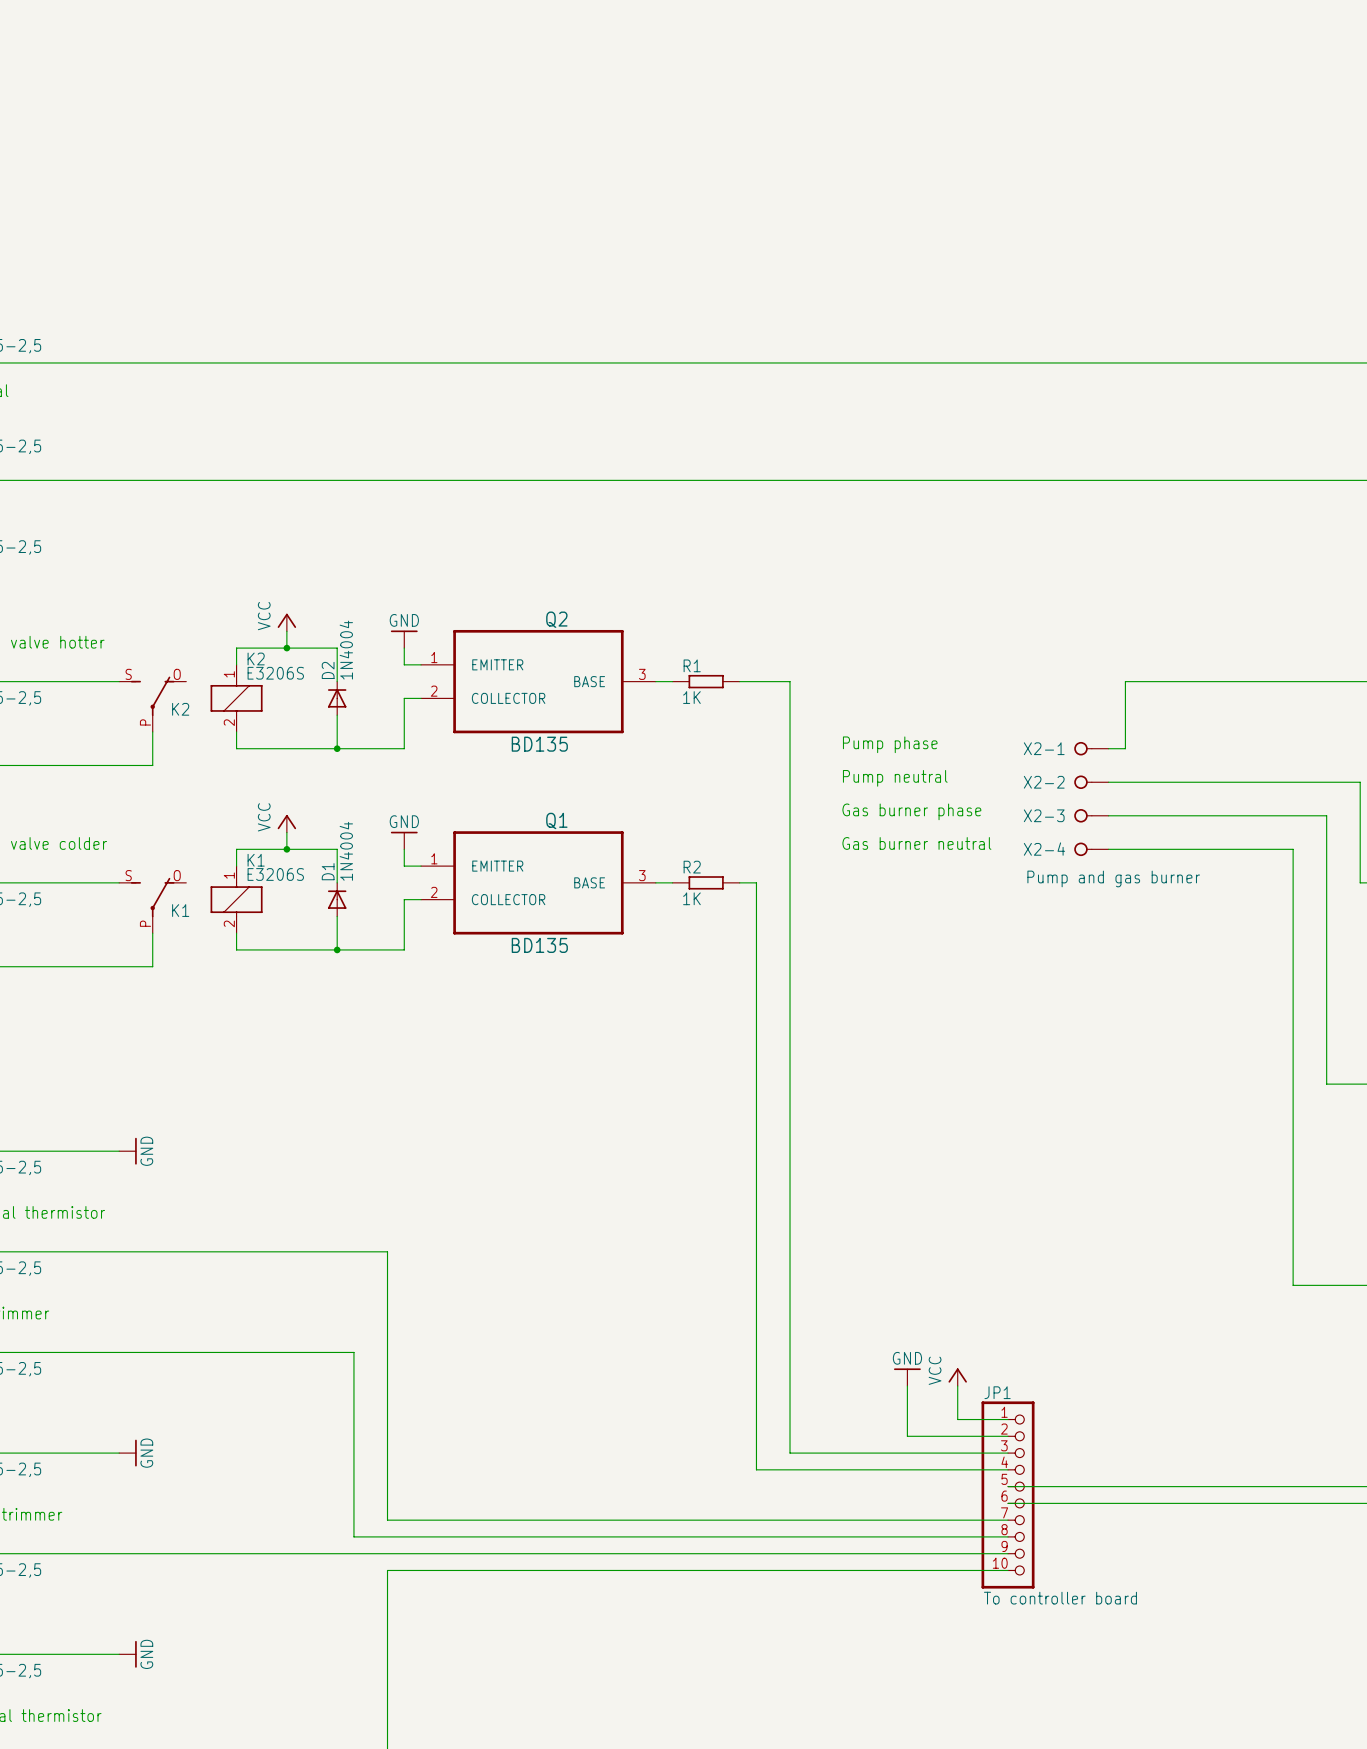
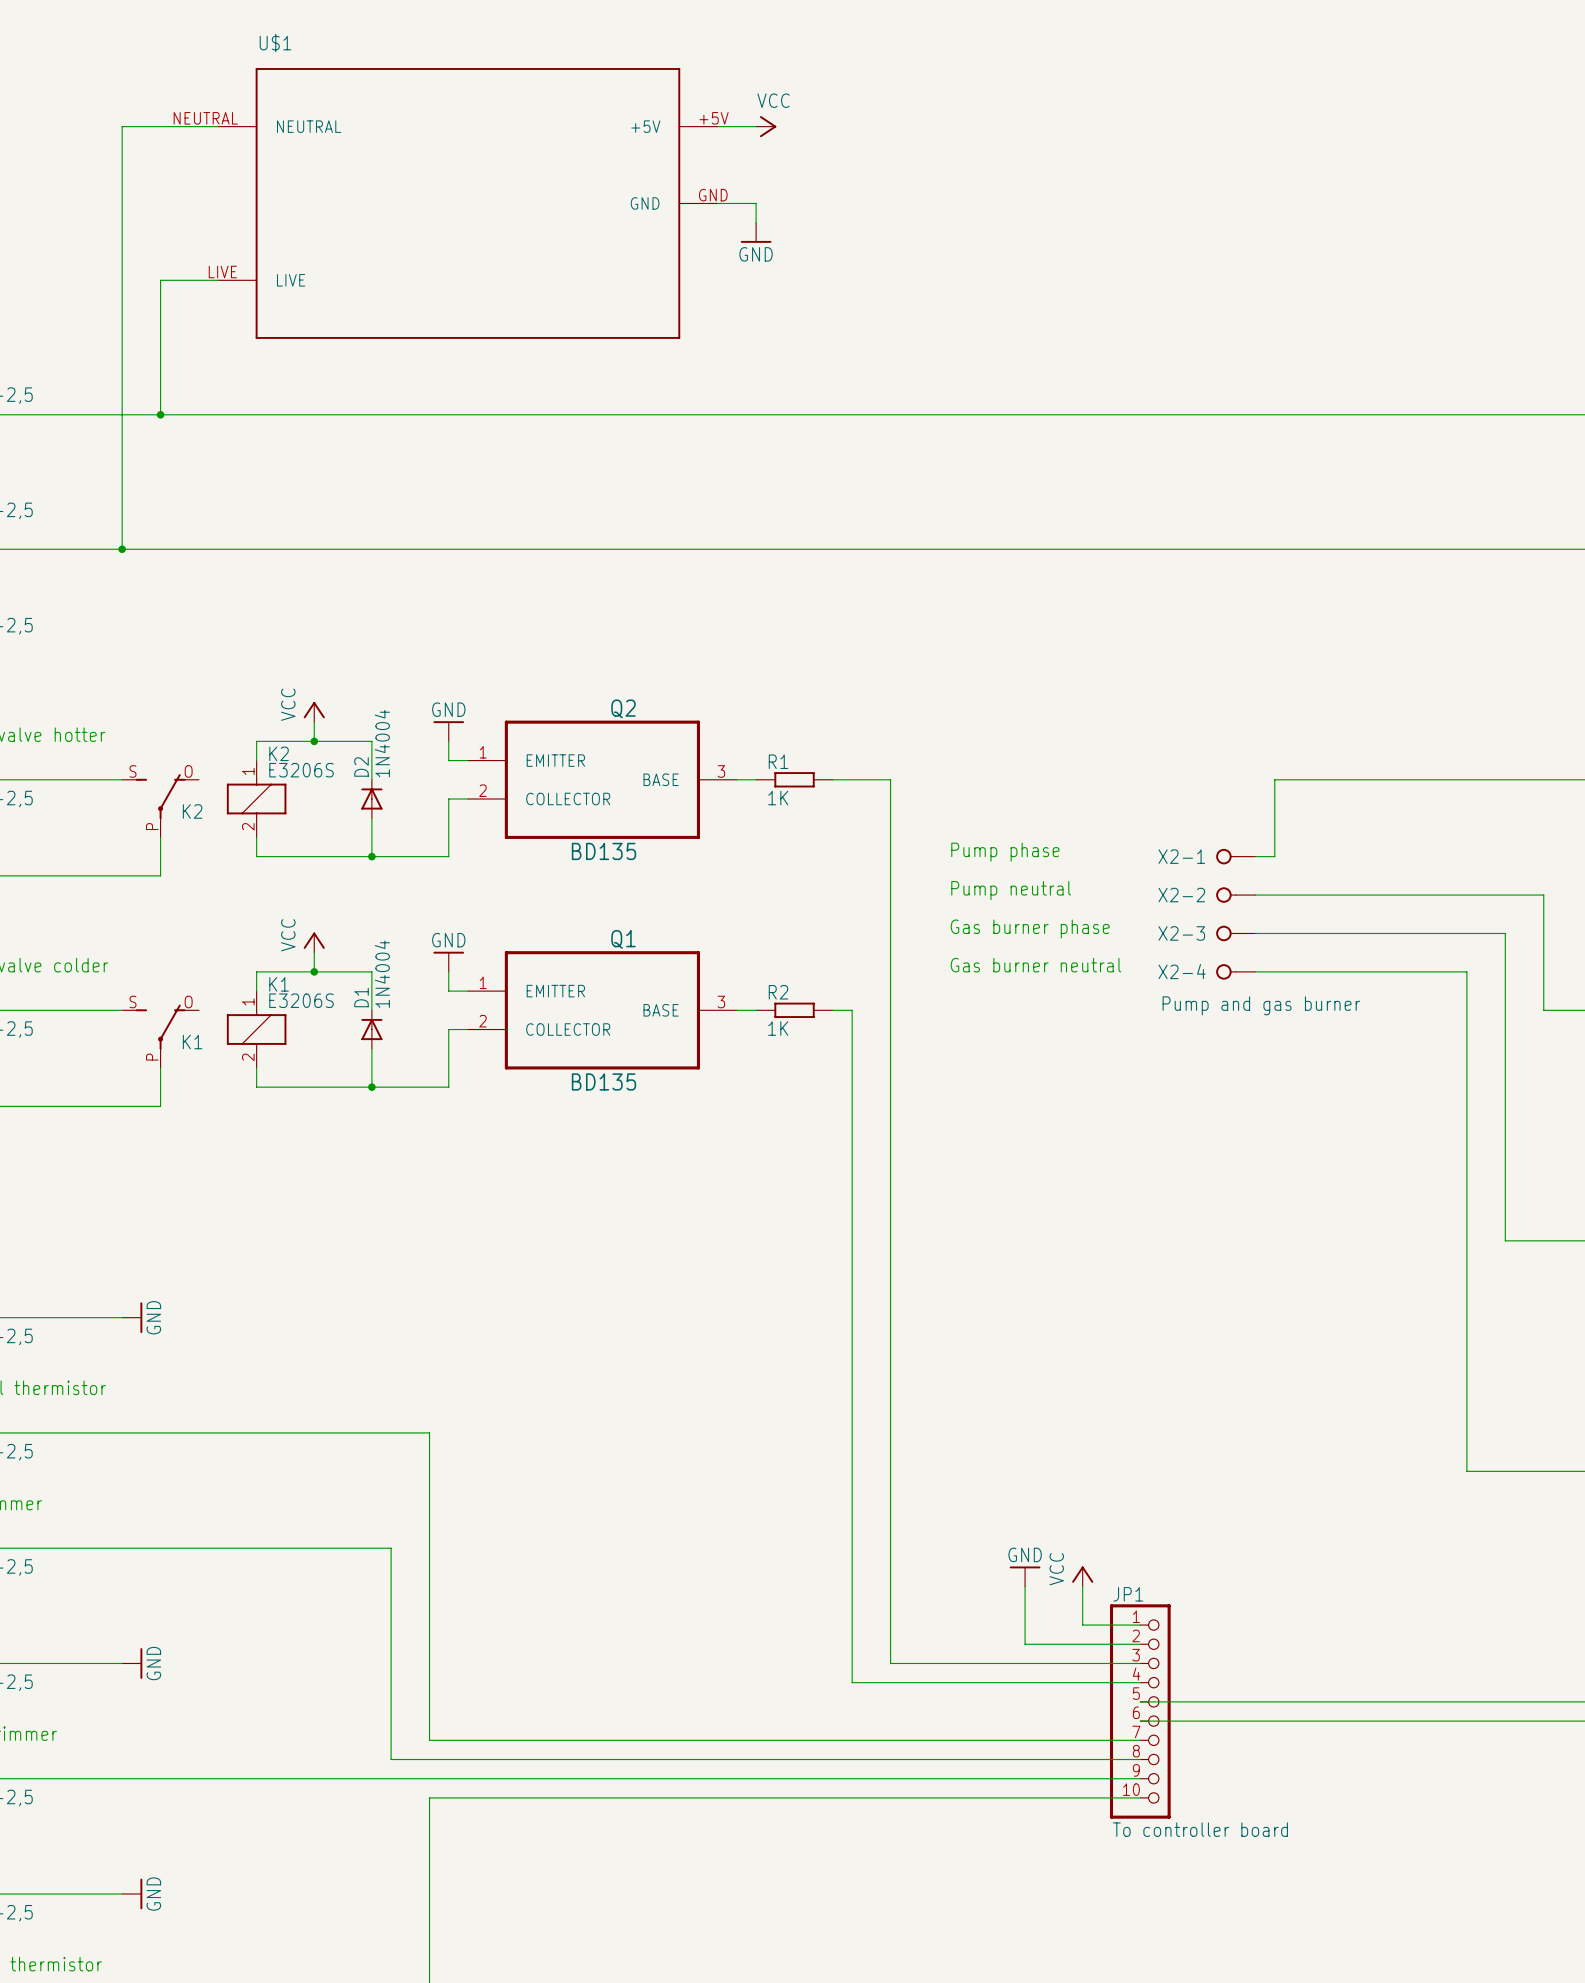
wire: none -> (218, 126) (122, 126) (122, 549)
wire: none -> (717, 126) (756, 126)
power symbol: none -> VCC (766, 126)
U$1: none -> (467, 203)
wire: none -> (717, 203) (756, 203) (756, 222)
power symbol: none -> GND (756, 232)
wire: none -> (218, 280) (160, 280) (160, 414)
junction: none -> (160, 414)
junction: none -> (122, 549)

